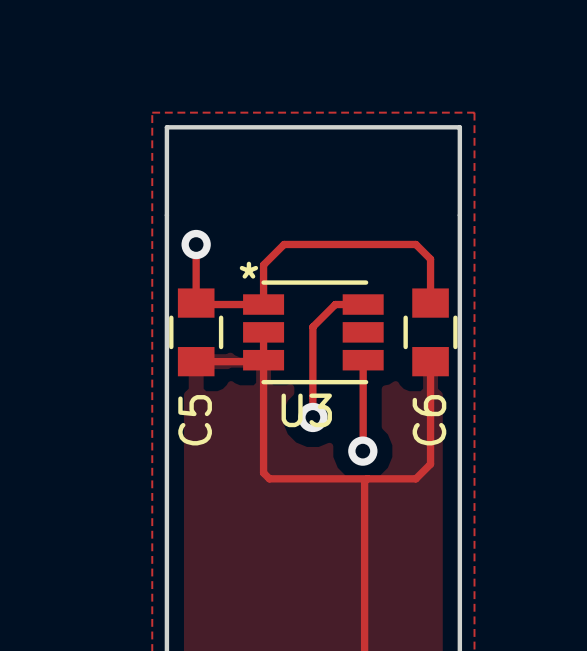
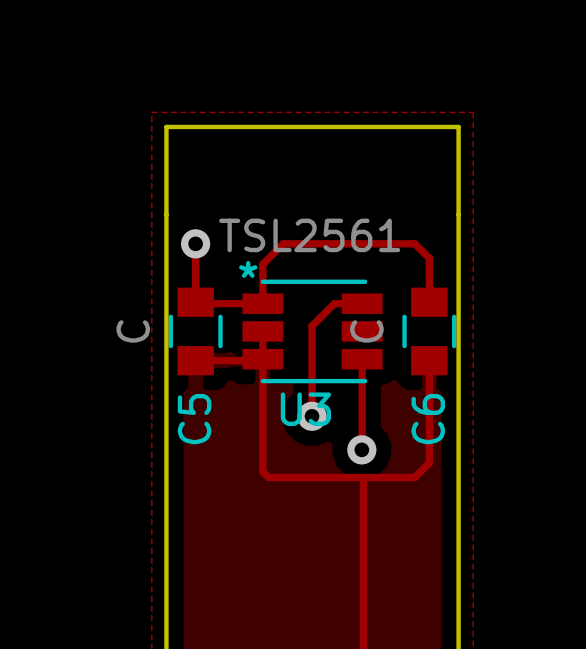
U3 value: none -> TSL2561 (309, 235)
C5 value: none -> C (133, 331)
C6 value: none -> C (366, 331)

